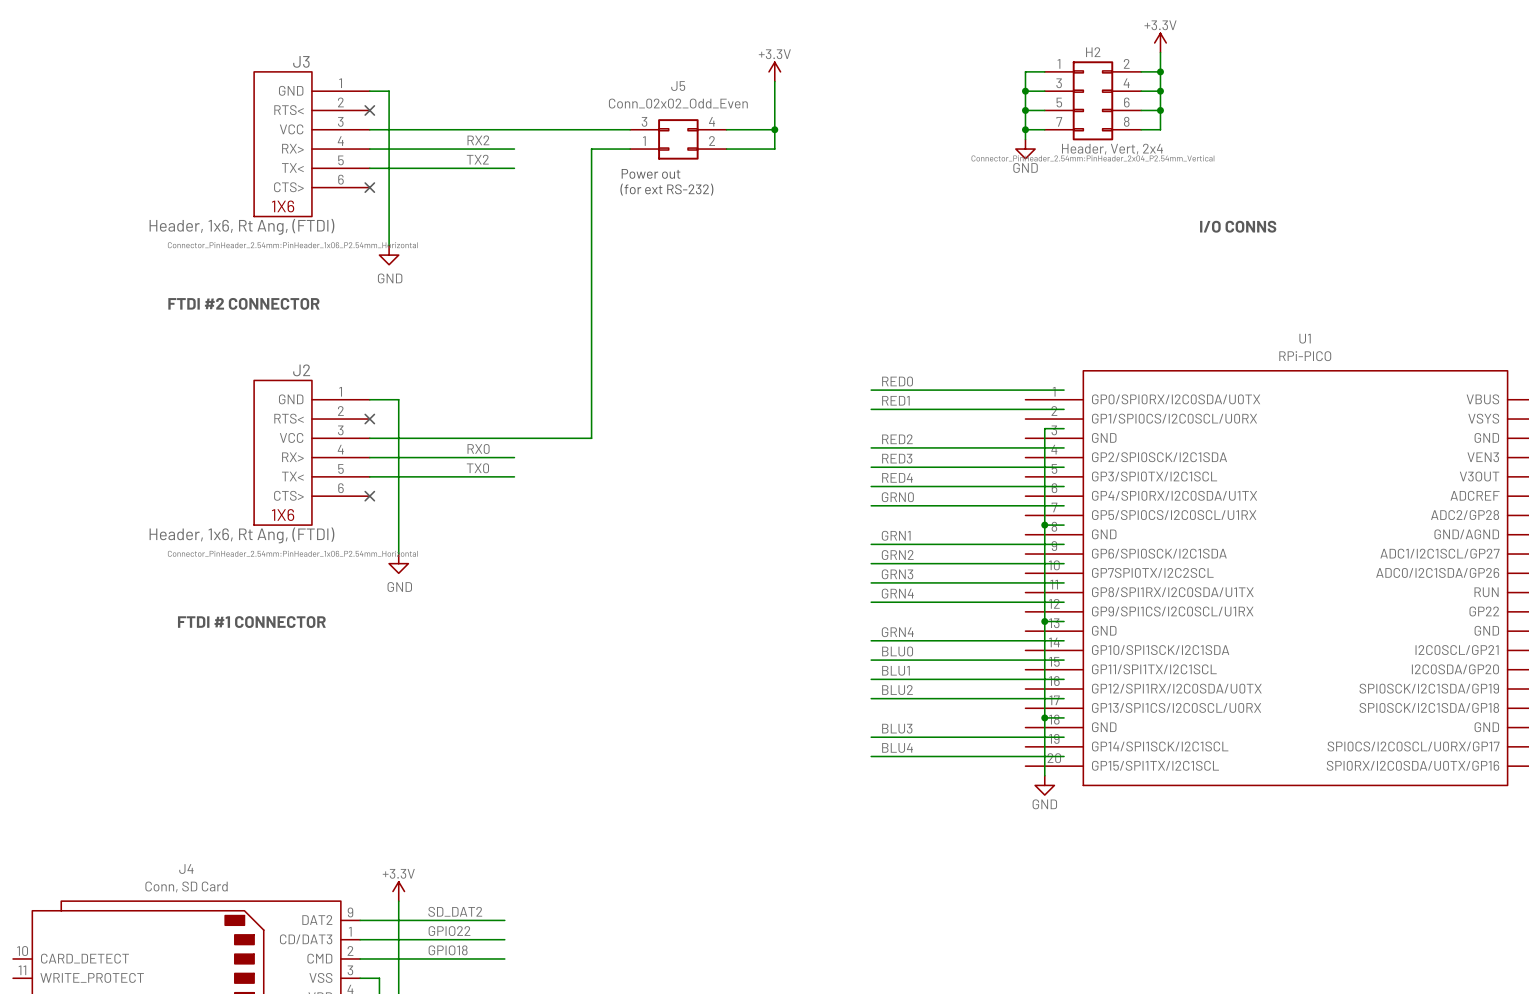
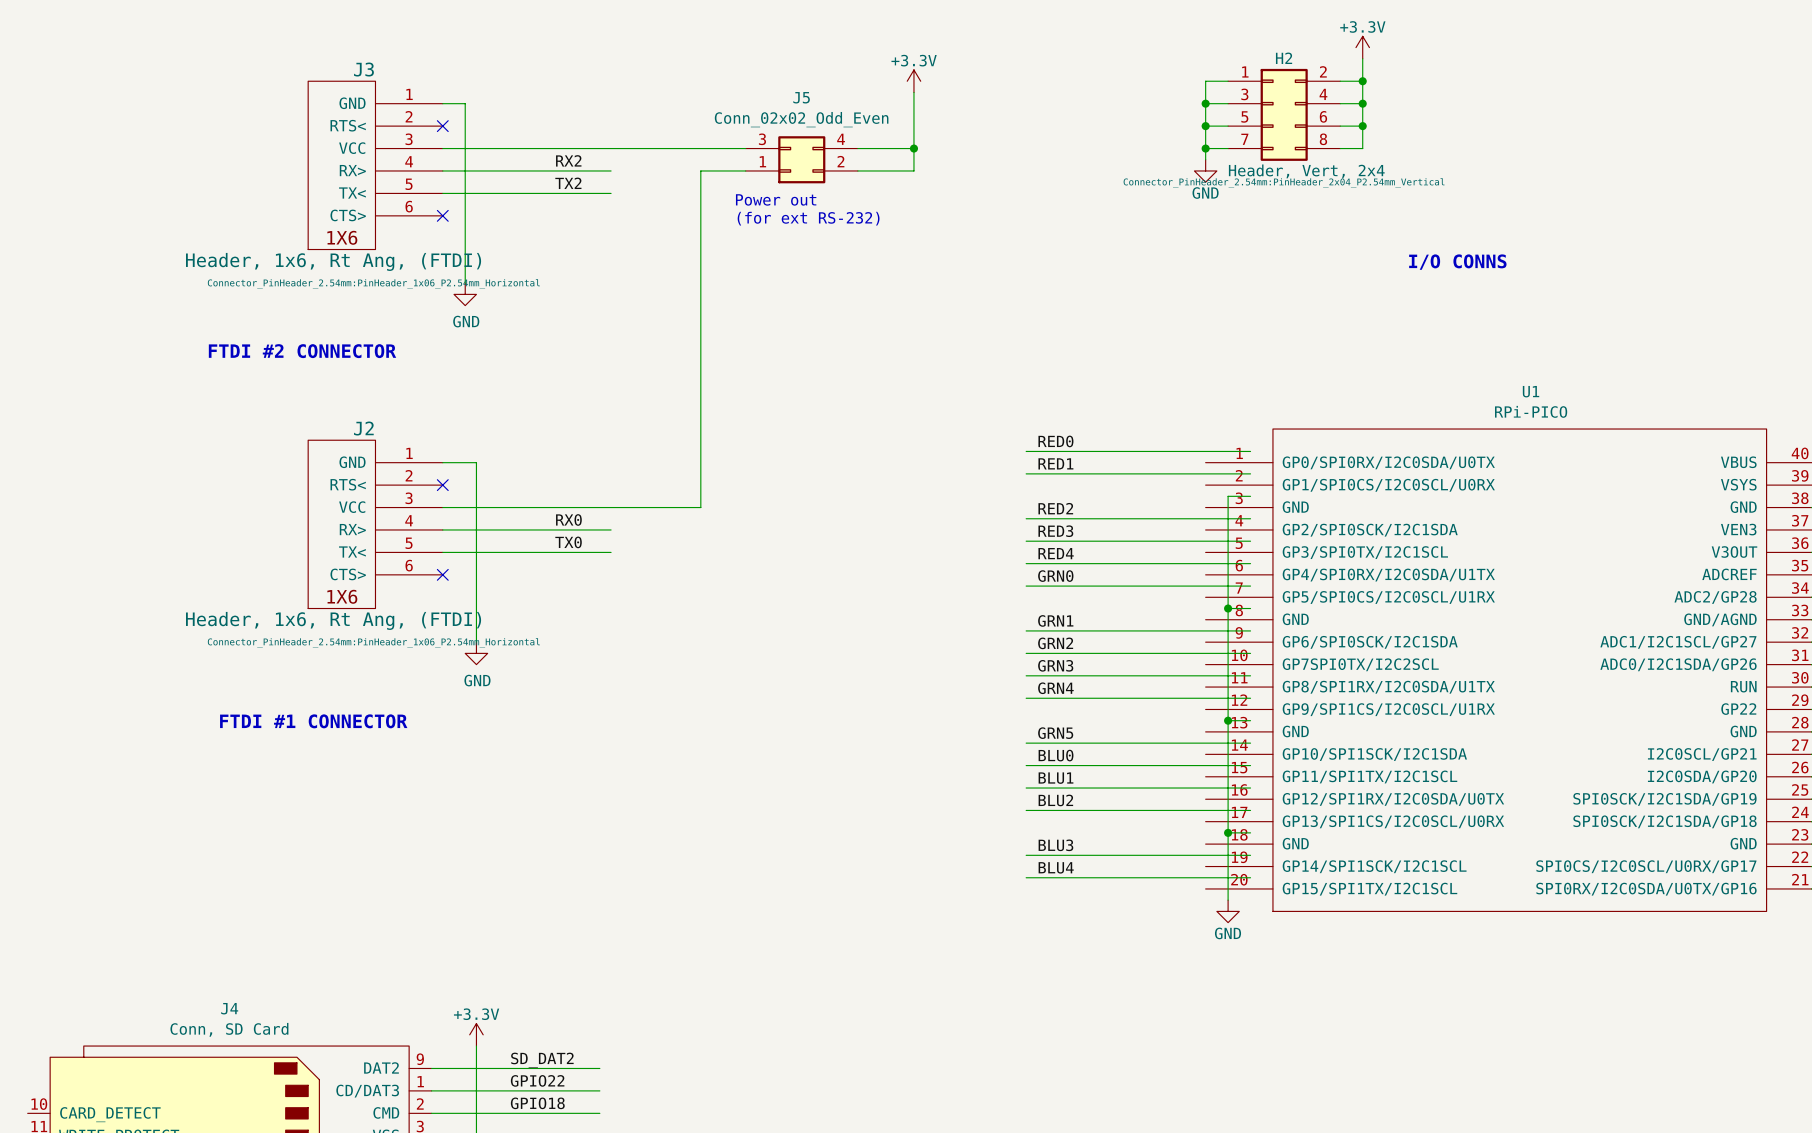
label: GRN4 (897, 632) -> GRN5 (1055, 733)

